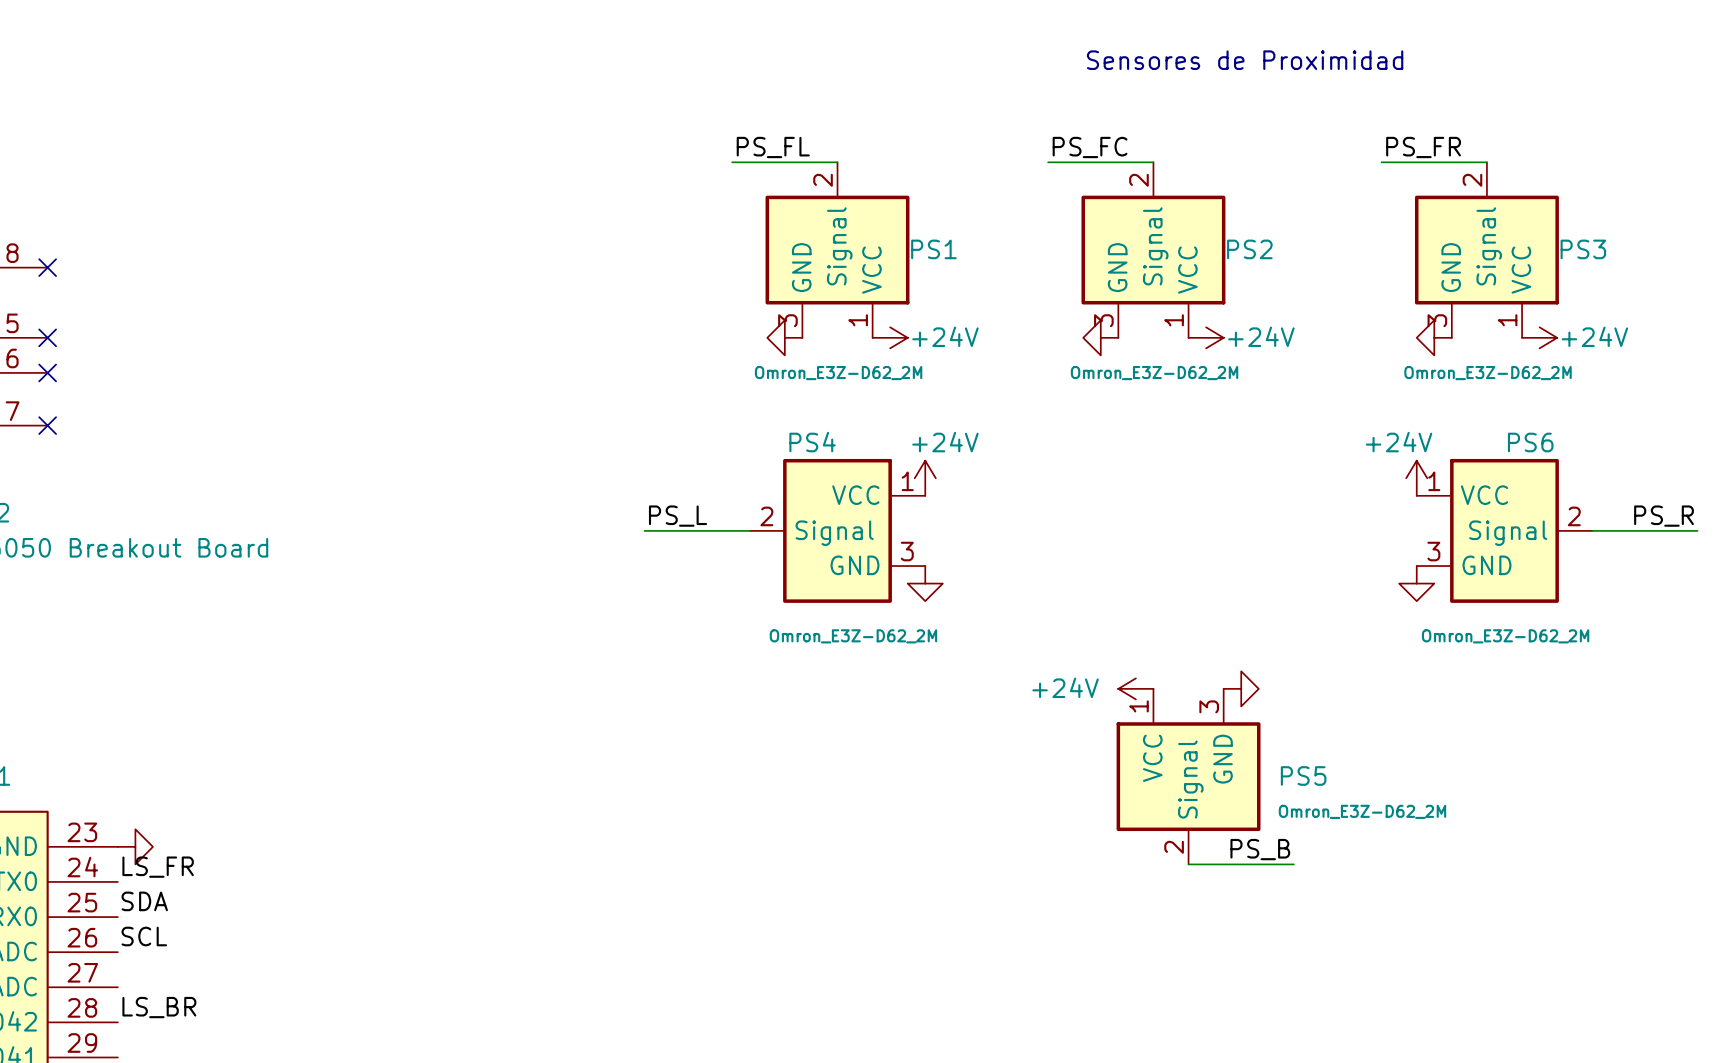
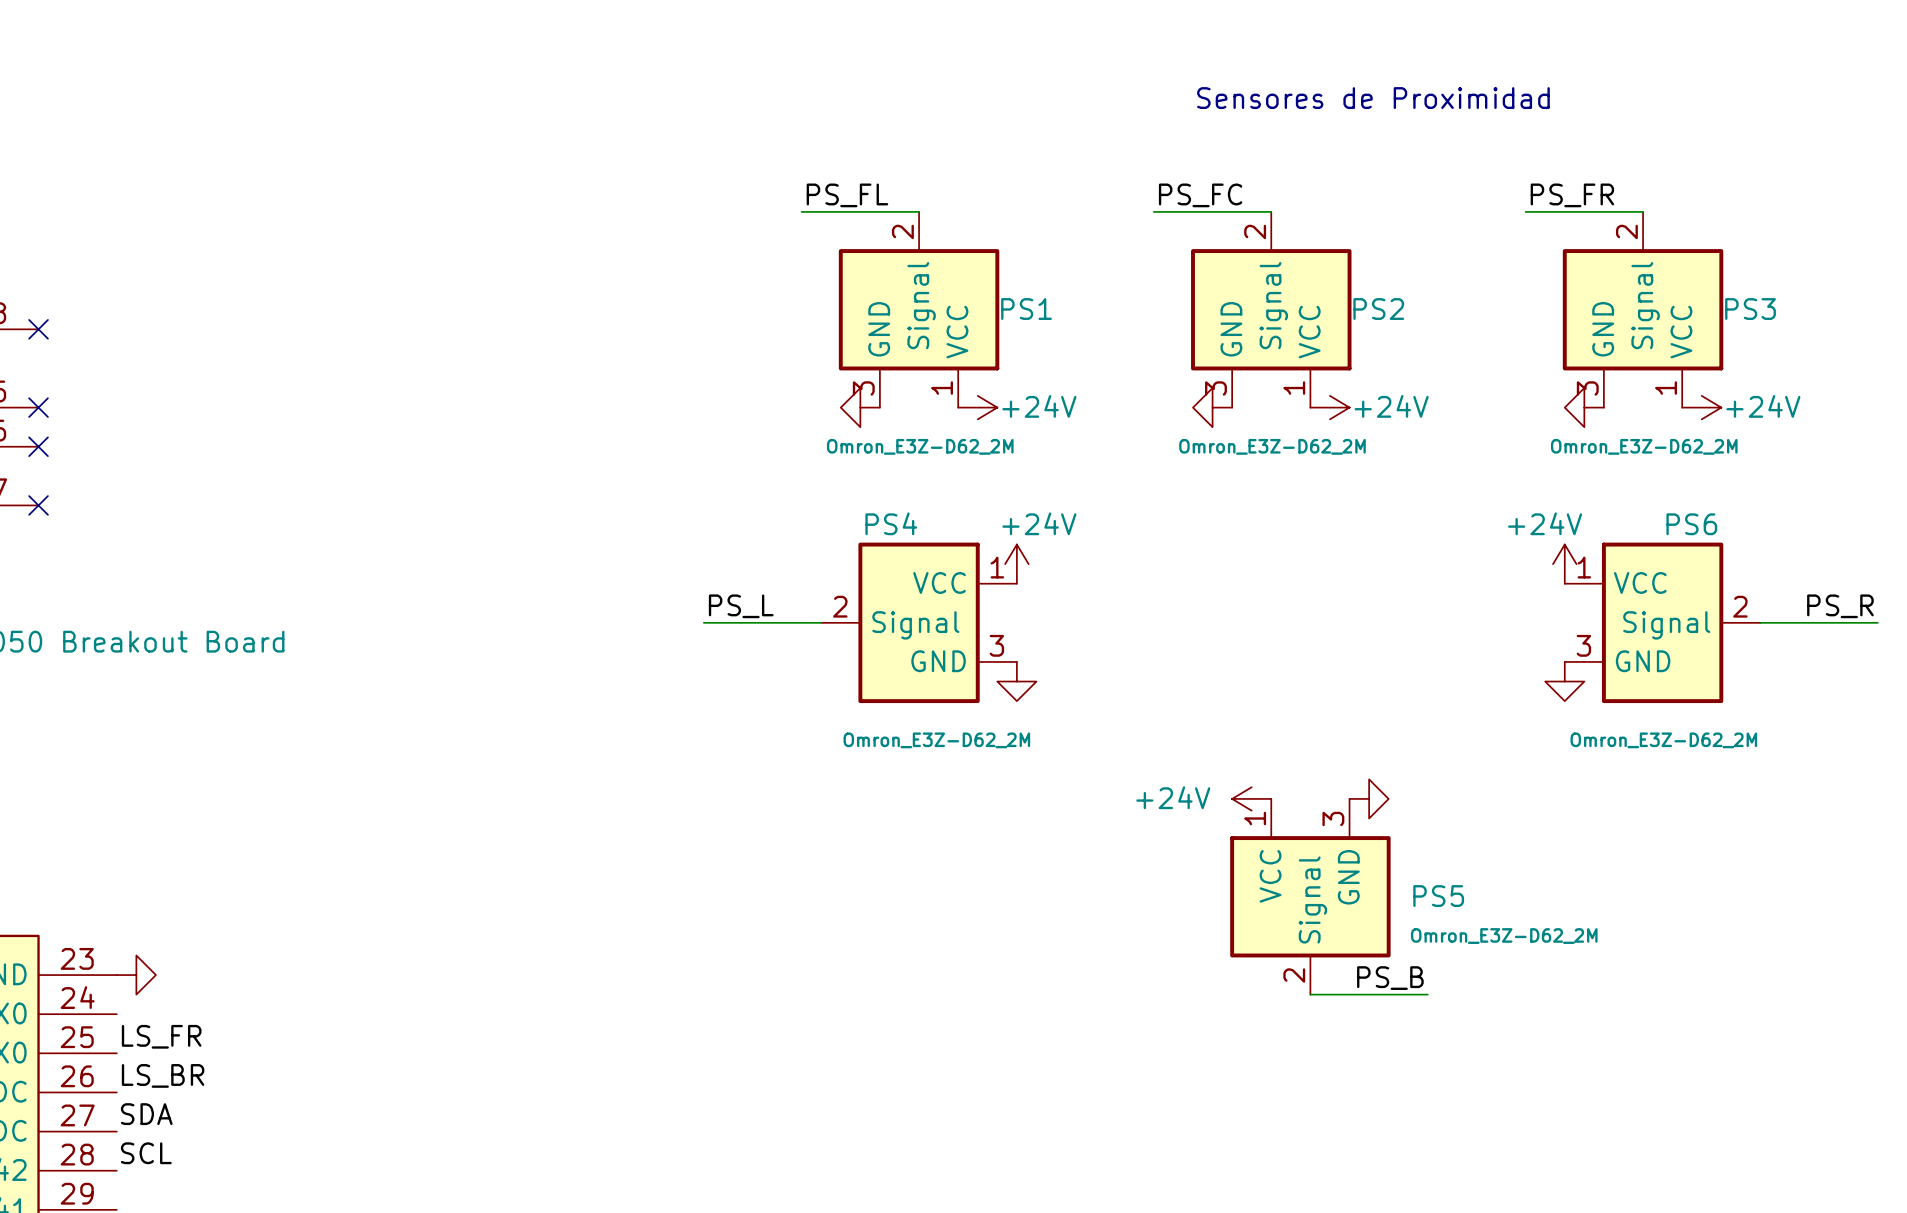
label: LS_FR (158, 867) -> none
label: SDA (144, 901) -> LS_FR (161, 1036)
label: SCL (144, 936) -> LS_BR (163, 1075)
label: none -> SDA (146, 1114)
label: LS_BR (159, 1007) -> SCL (146, 1153)

